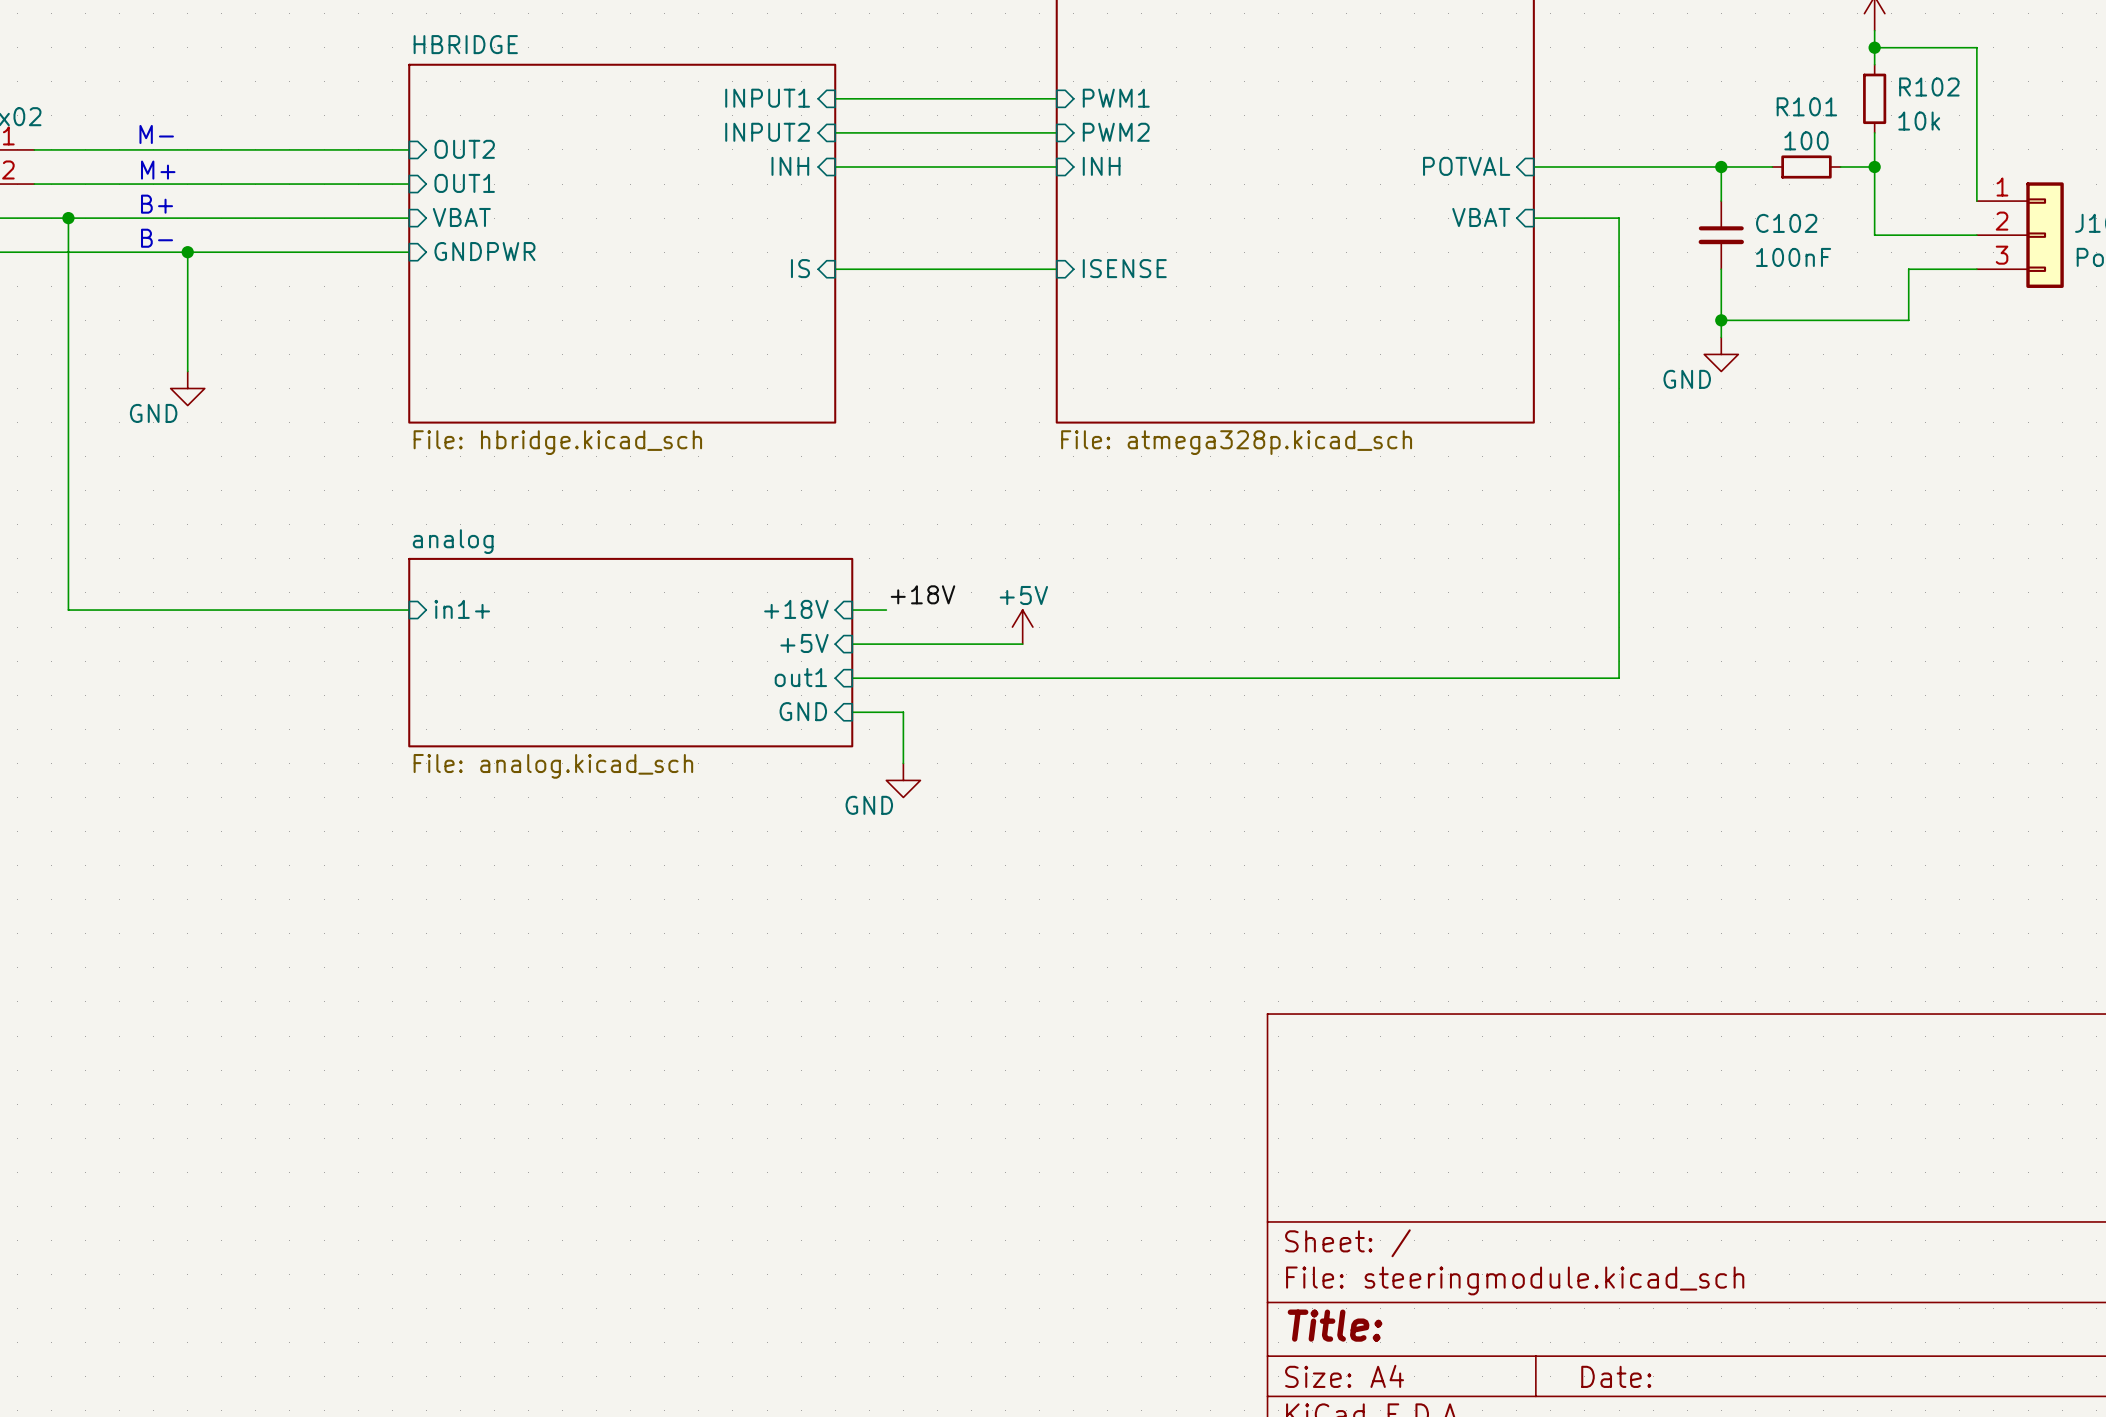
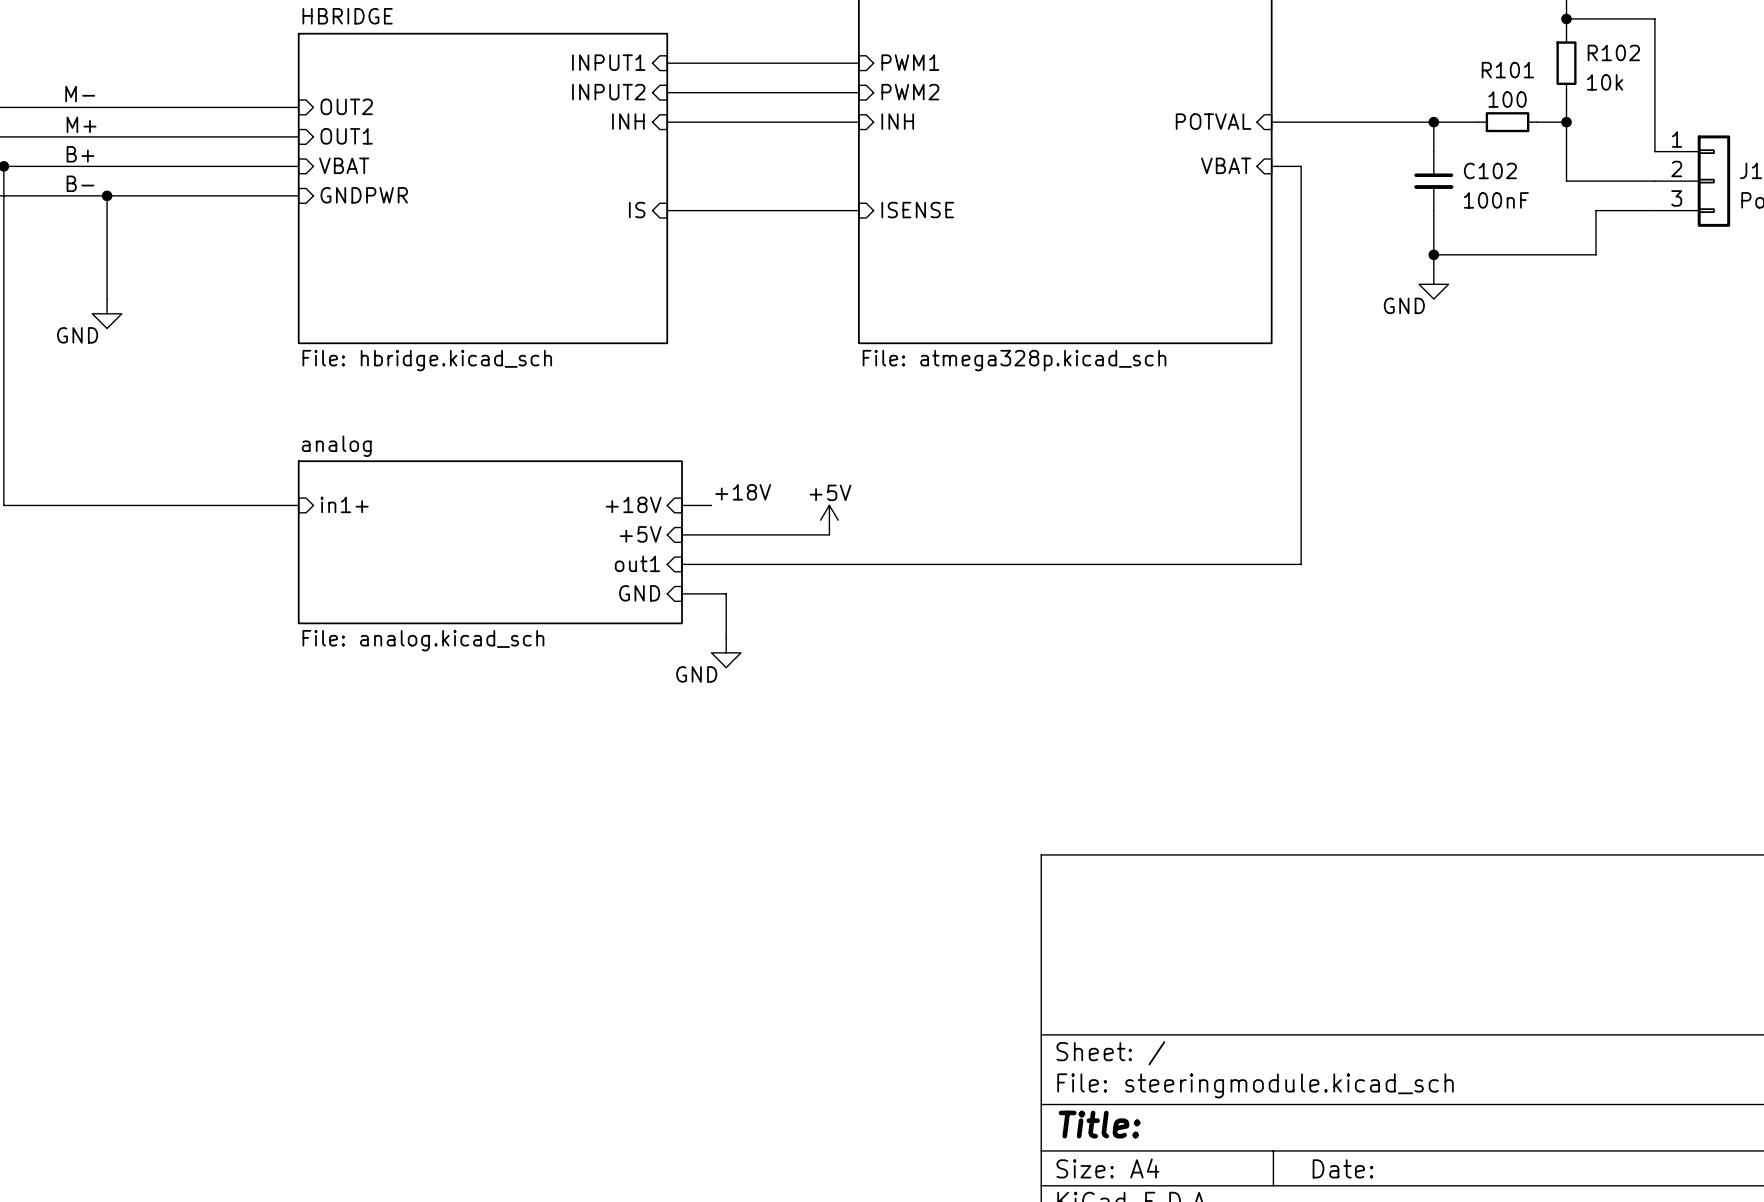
wire: (1567, 218) (1619, 218) (1619, 678) (1567, 678) -> (1301, 166) (1301, 564)

